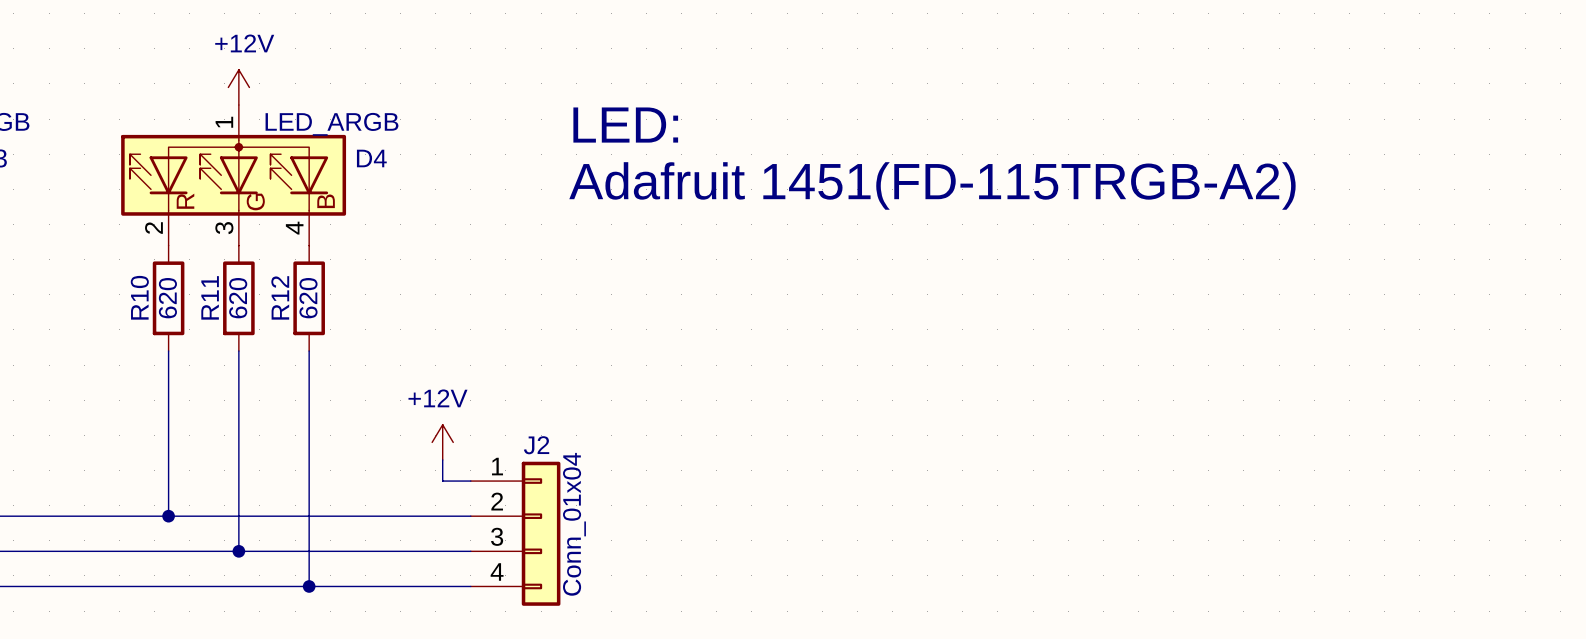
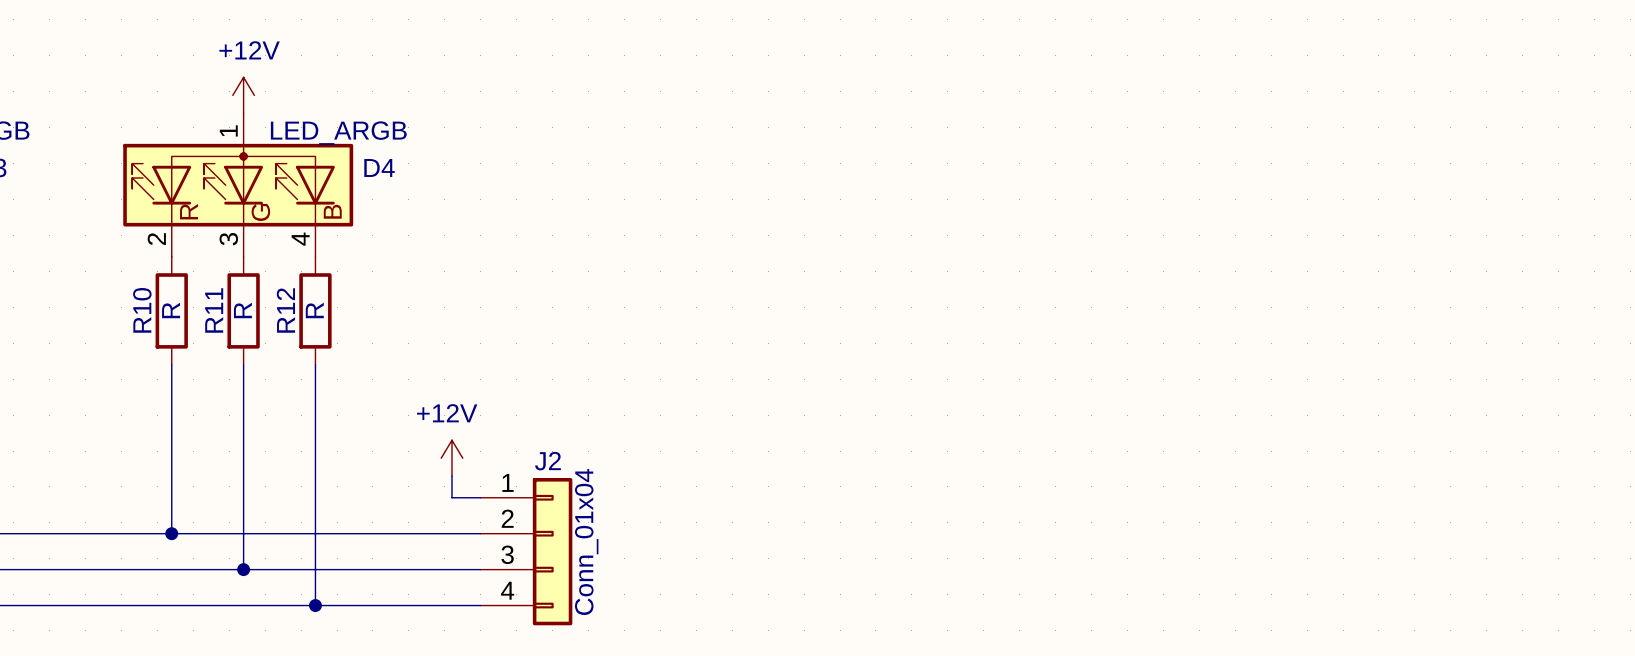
text: LED: (625, 125) -> none
text: Adafruit 1451(FD-115TRGB-A2) (932, 185) -> none
R10 value: 620 (167, 298) -> R (171, 310)
R11 value: 620 (238, 298) -> R (242, 310)
R12 value: 620 (308, 298) -> R (314, 310)

